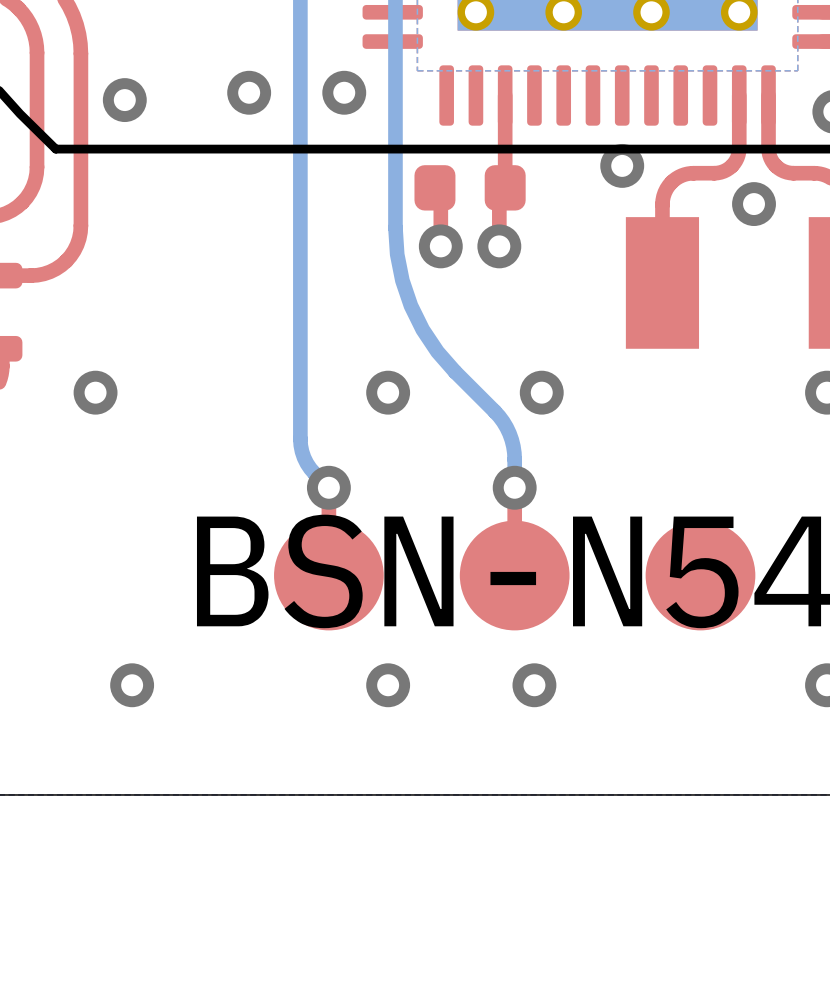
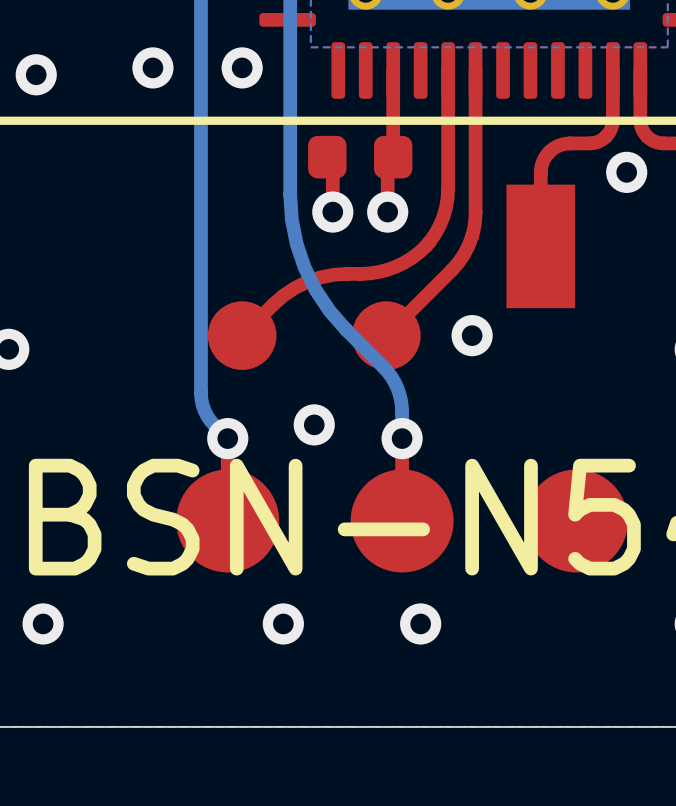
top track: none -> (448, 70) (447, 198) (443, 216) (429, 241) (411, 258) (387, 269) (369, 273) (333, 274) (307, 281) (294, 287) (273, 304) (242, 335)
top track: none -> (475, 70) (475, 212) (472, 236) (458, 262) (386, 335)
via: (622, 165) -> none
part: none -> (242, 335)
part: none -> (386, 335)
via: (388, 392) -> none
via position: (541, 392) -> (472, 335)
via: none -> (314, 424)

